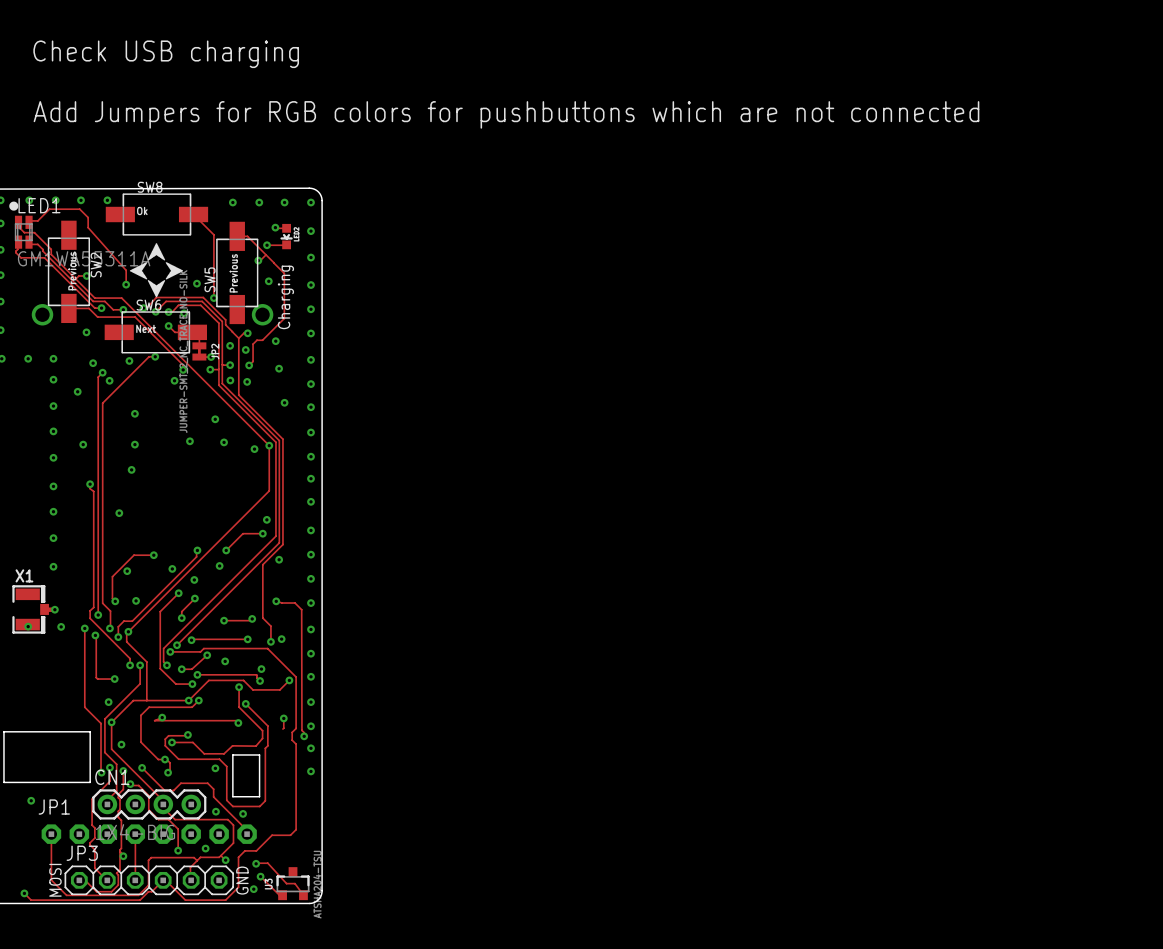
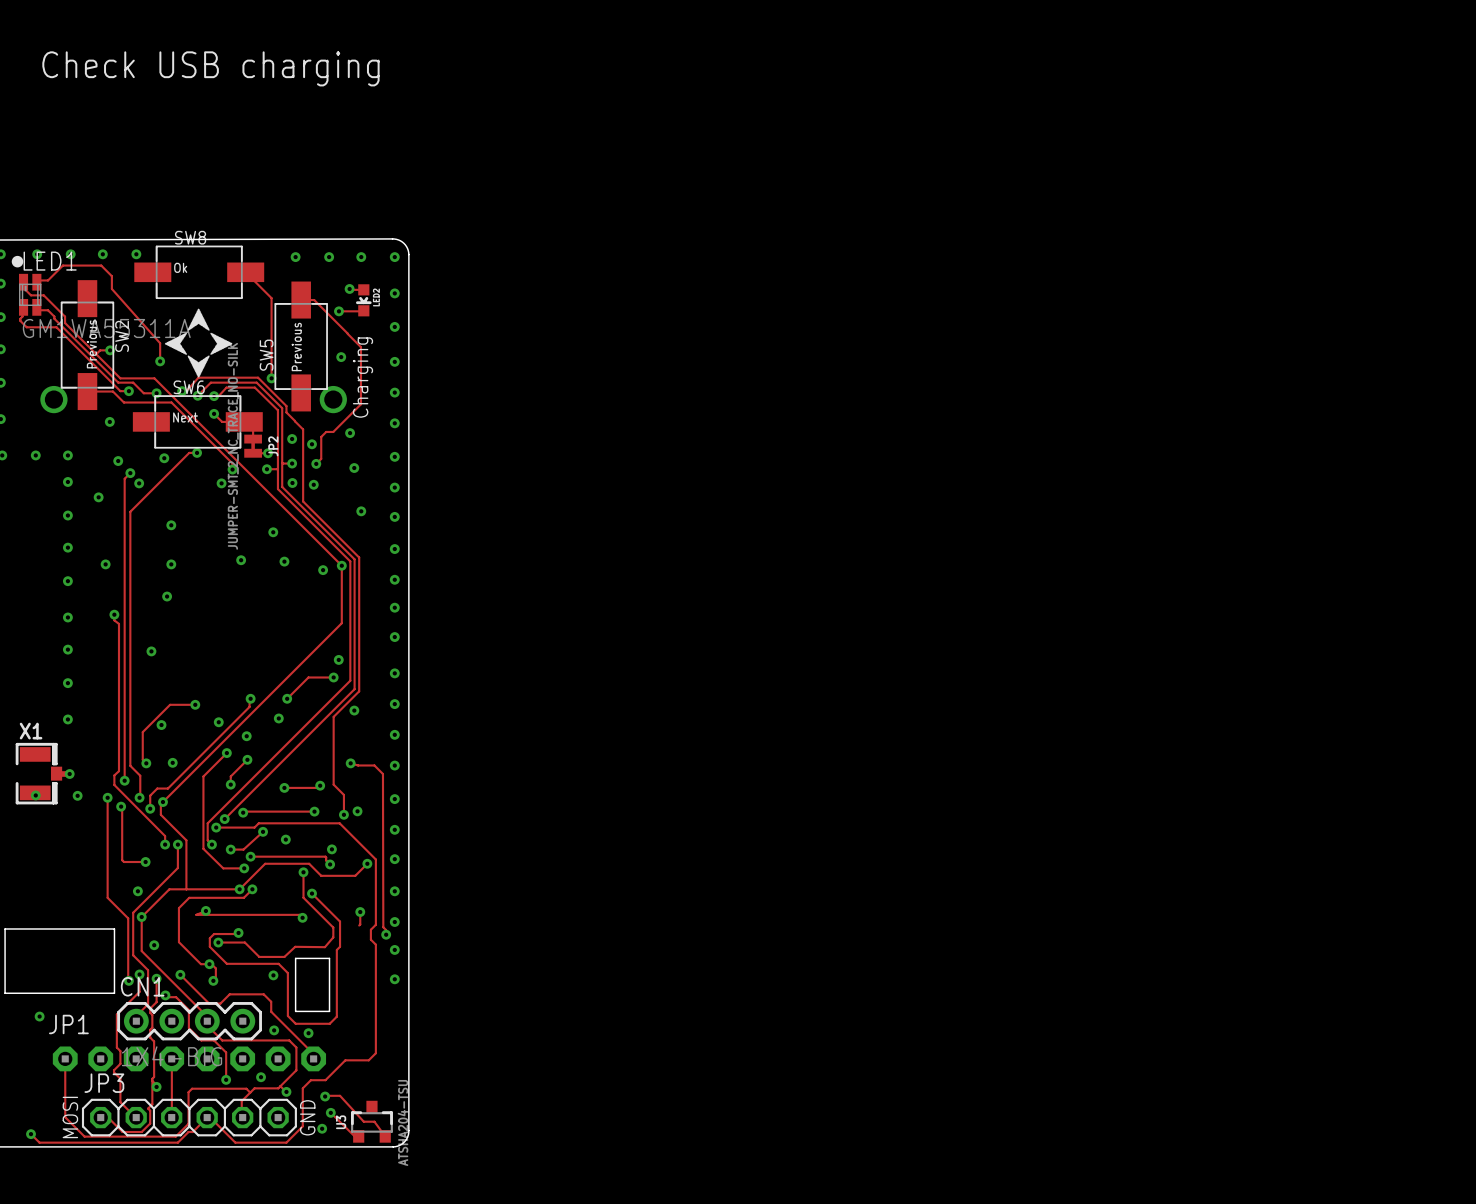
text: Add Jumpers for RGB colors for pushbuttons which are not connected (506, 114) -> none
track: (266, 254) (258, 260) -> none
via: (258, 260) -> none
via: (196, 283) -> none
via: (184, 313) -> none
track: (247, 333) (243, 333) (238, 338) -> none
via: (247, 333) -> none

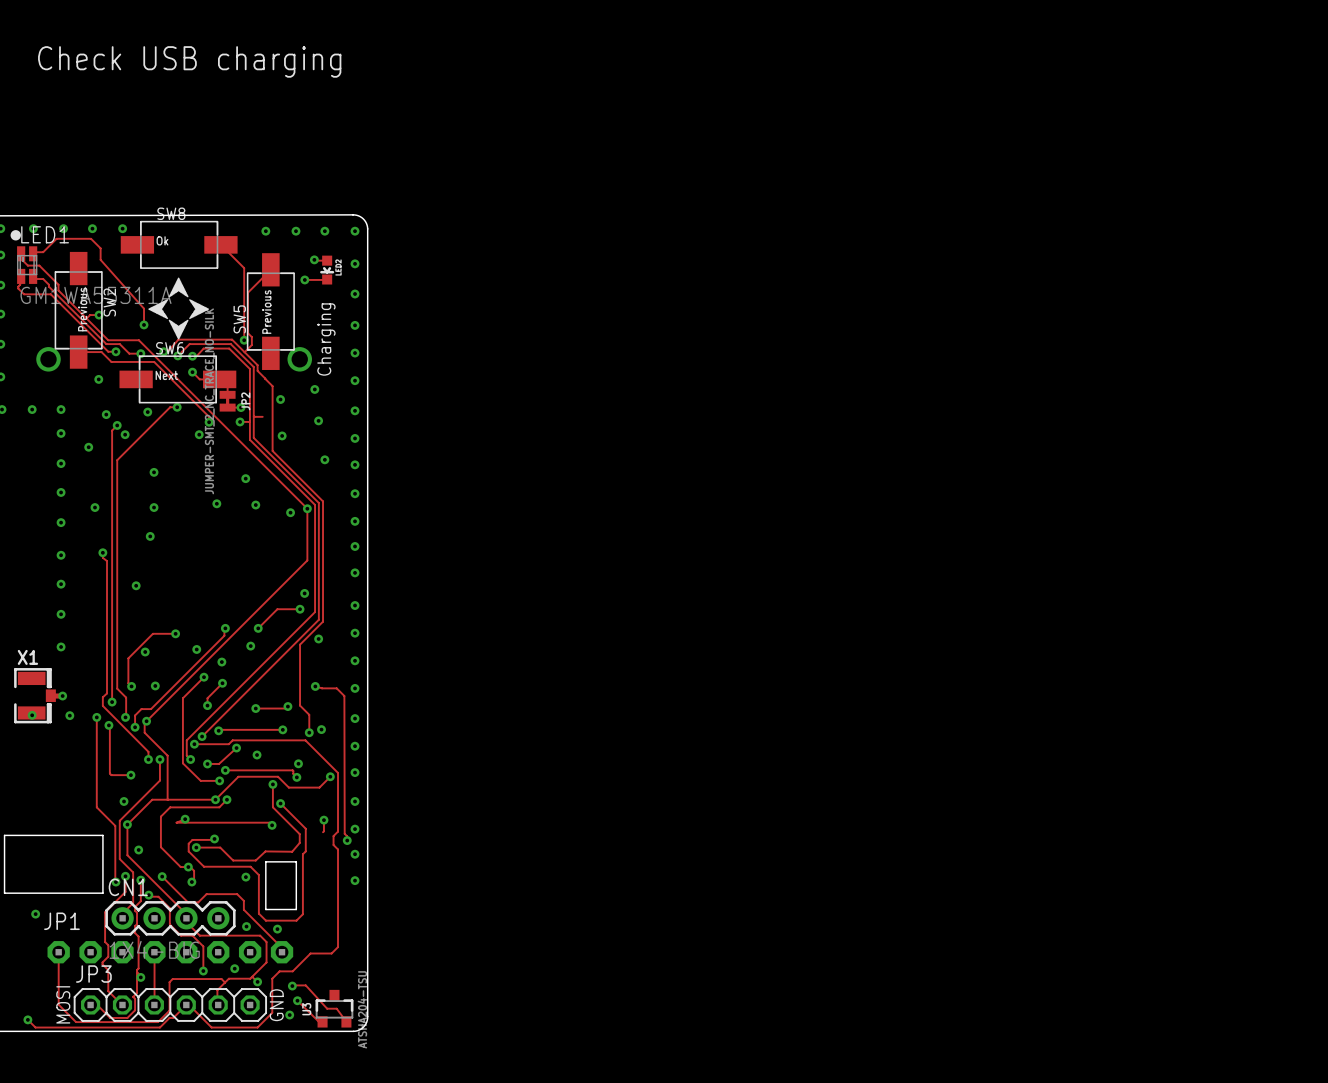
track: (301, 300) (314, 300) (360, 347) (360, 404) (333, 431) (326, 431) (321, 436) (321, 458) (316, 463) -> (270, 269) (248, 292) (248, 333) (251, 337) (251, 345) (244, 352)
via: (341, 357) -> none
via: (292, 439) -> none
via: (292, 463) -> none
via: (316, 463) -> none
via: (292, 483) -> none

